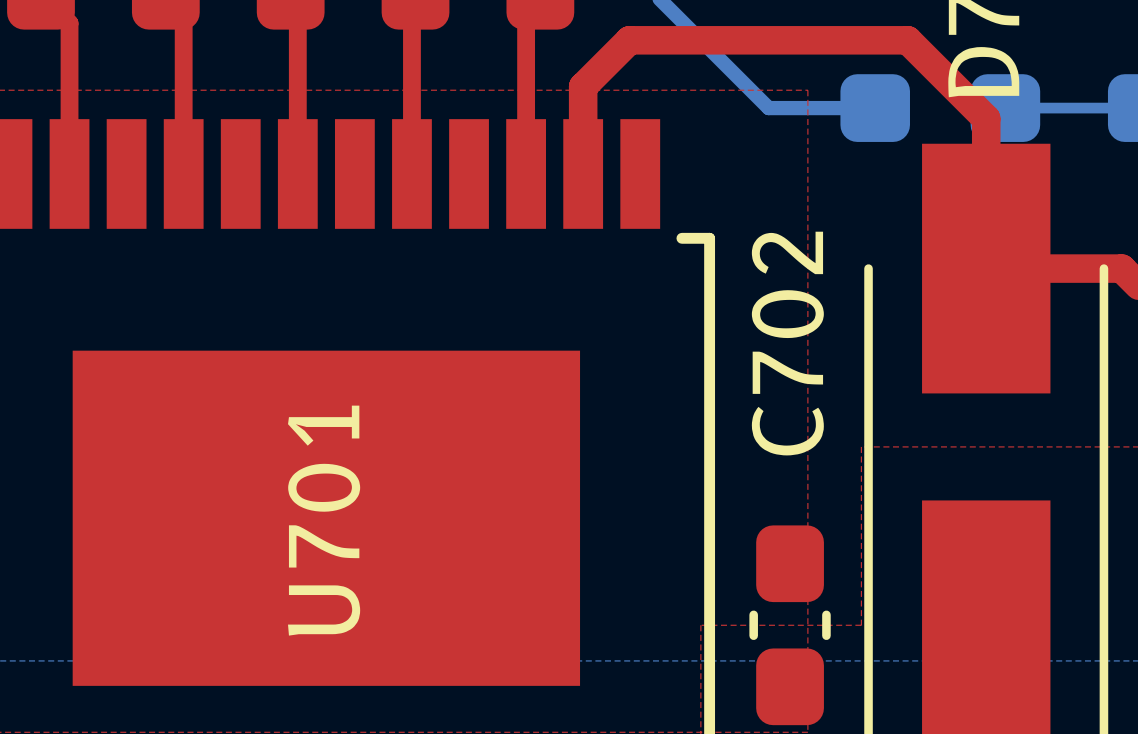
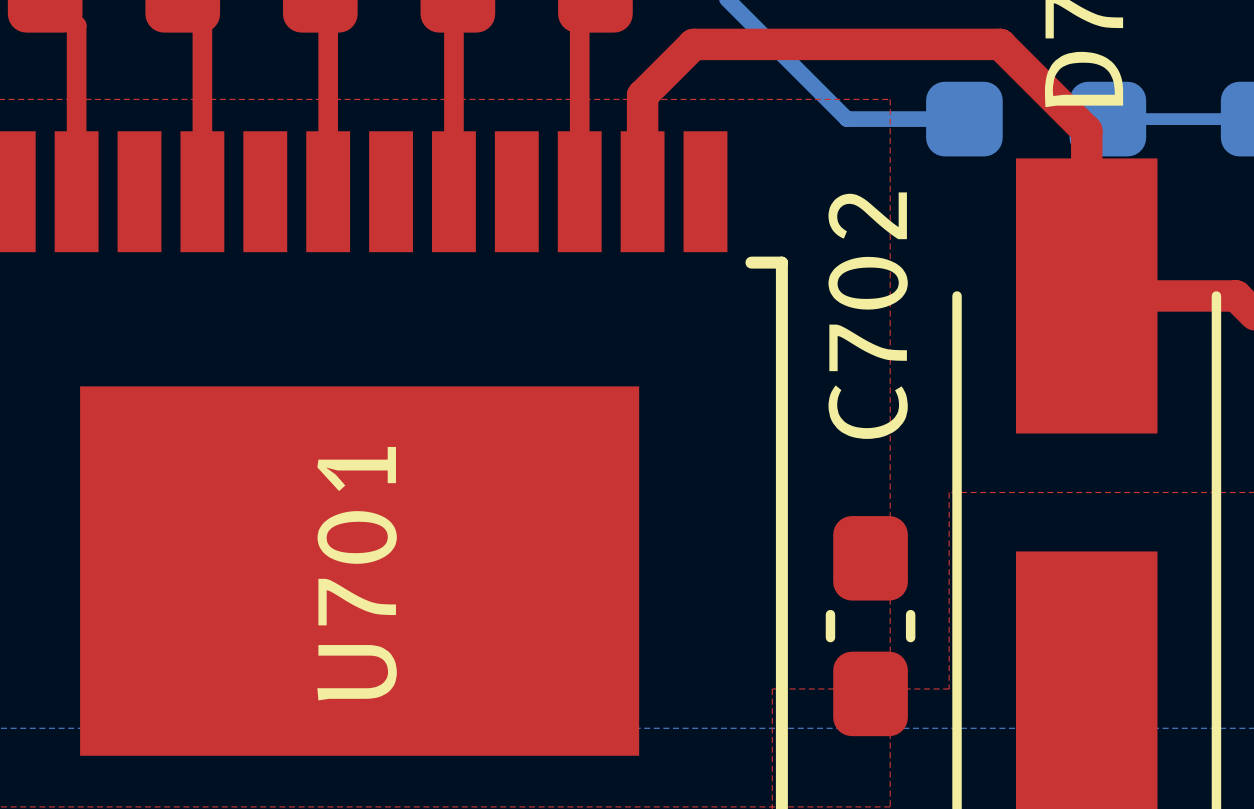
C702 position: (790, 625) -> (870, 626)

